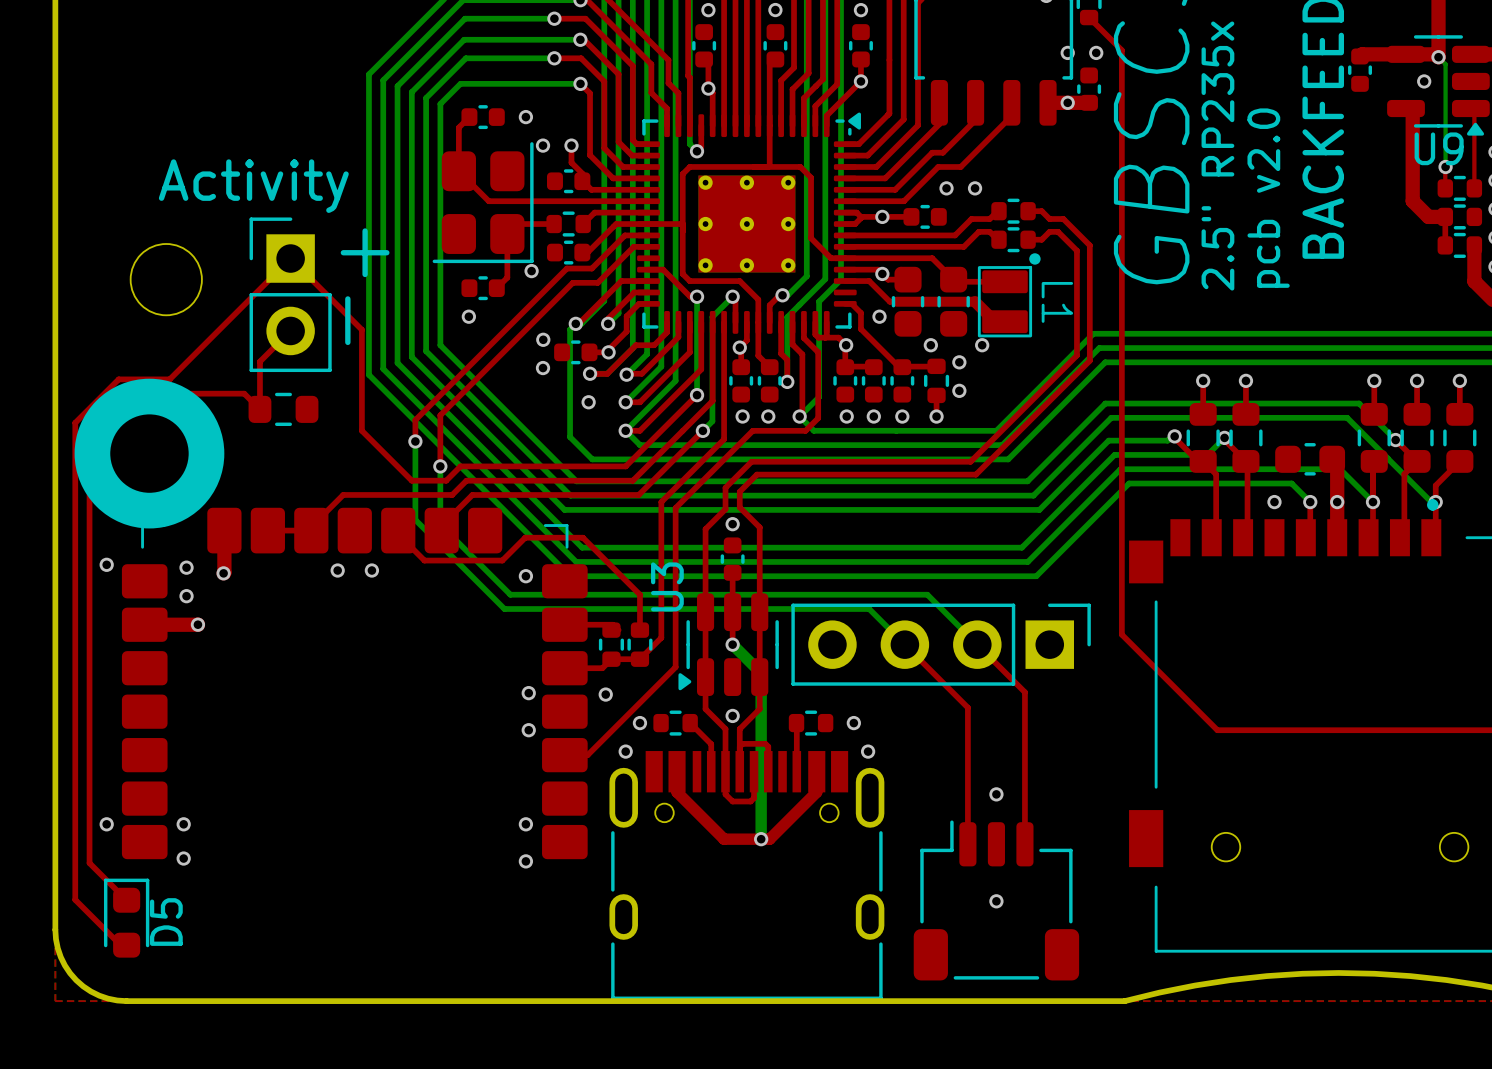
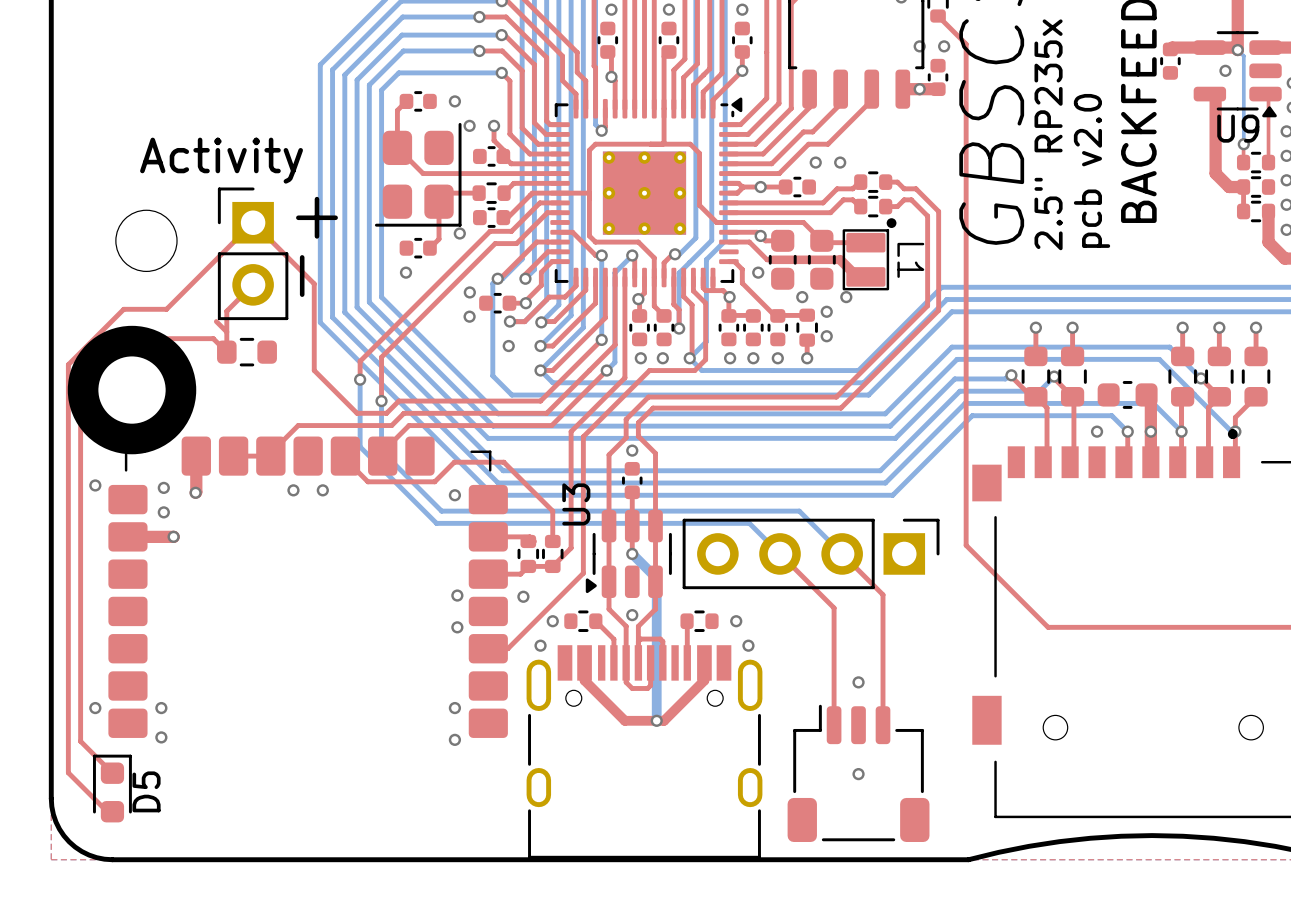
top track: (189, 359) (169, 379) (118, 379) (75, 424) -> (166, 309) (123, 309) (68, 364)
top track: none -> (216, 321) (226, 331)

